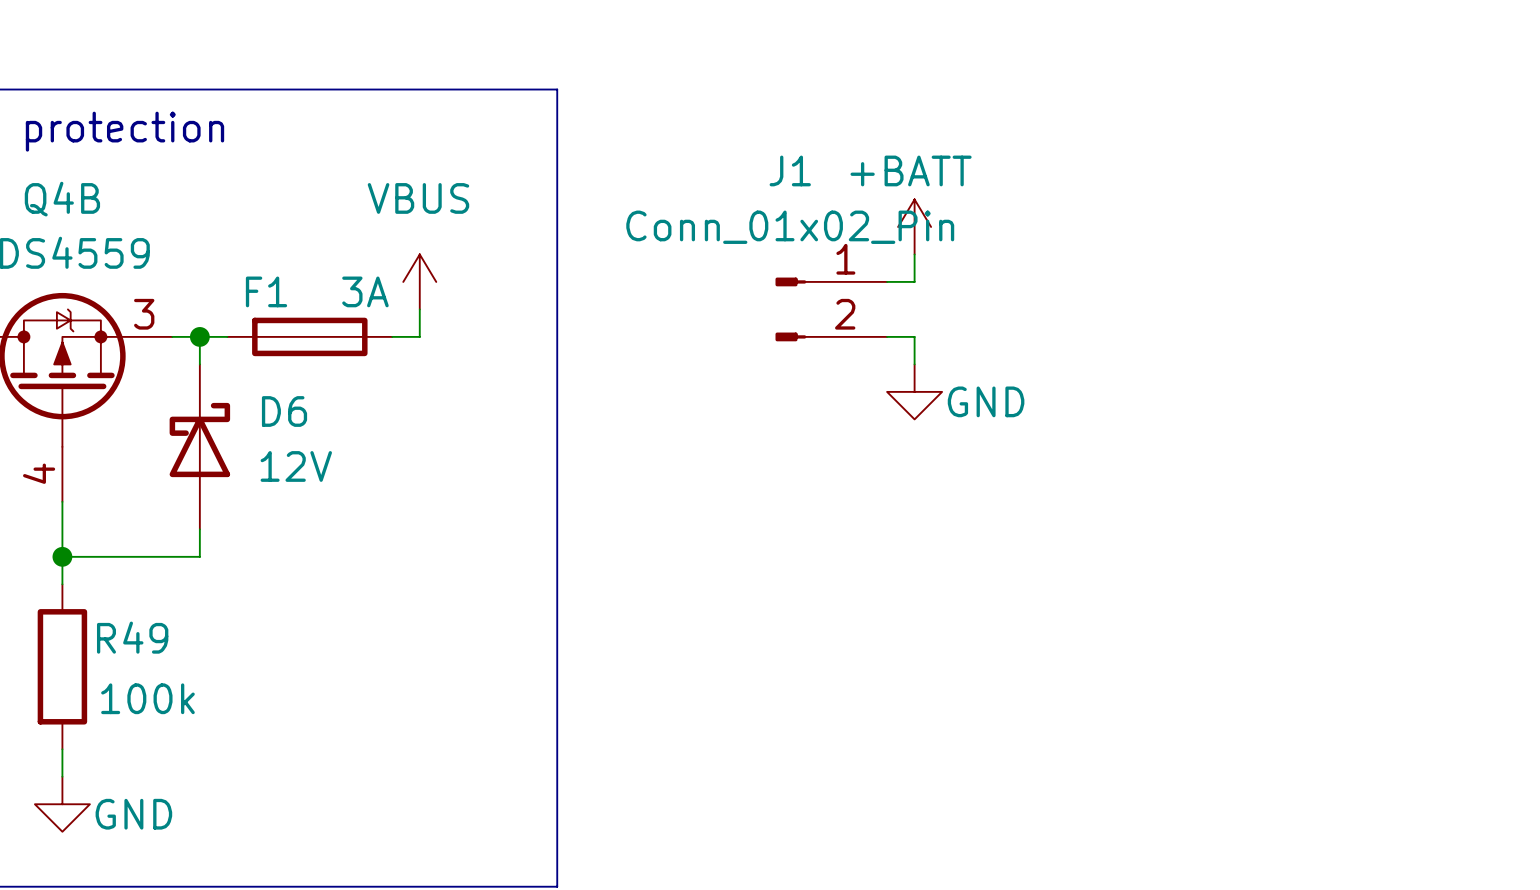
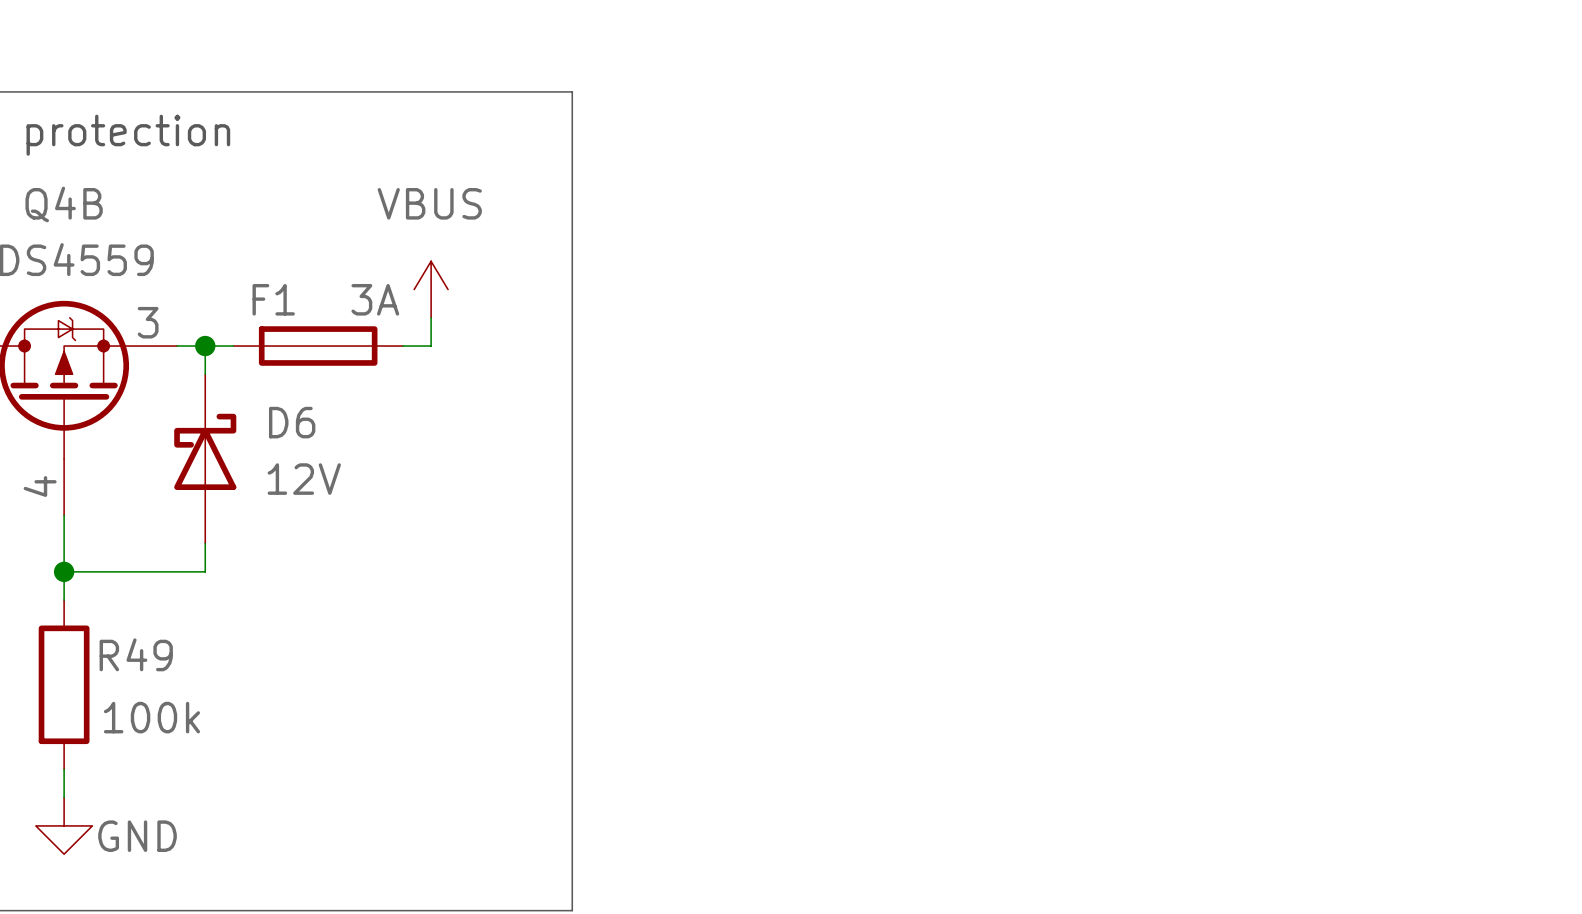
power symbol: +BATT (914, 226) -> none
wire: (914, 254) (914, 281) (887, 281) -> none
J1: Conn_01x02_Pin (831, 309) -> none
wire: (887, 336) (914, 336) (914, 364) -> none
power symbol: GND (914, 391) -> none

